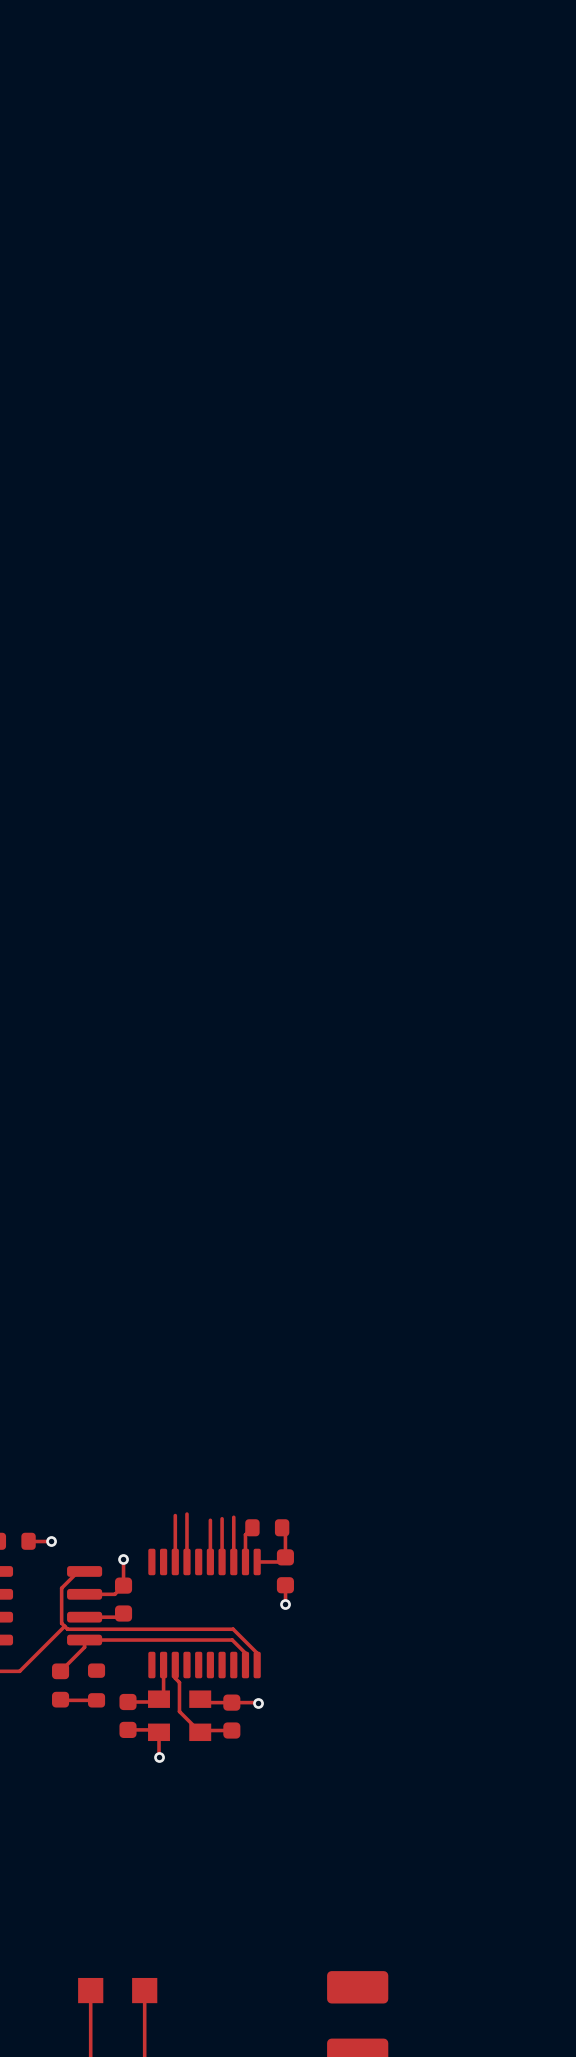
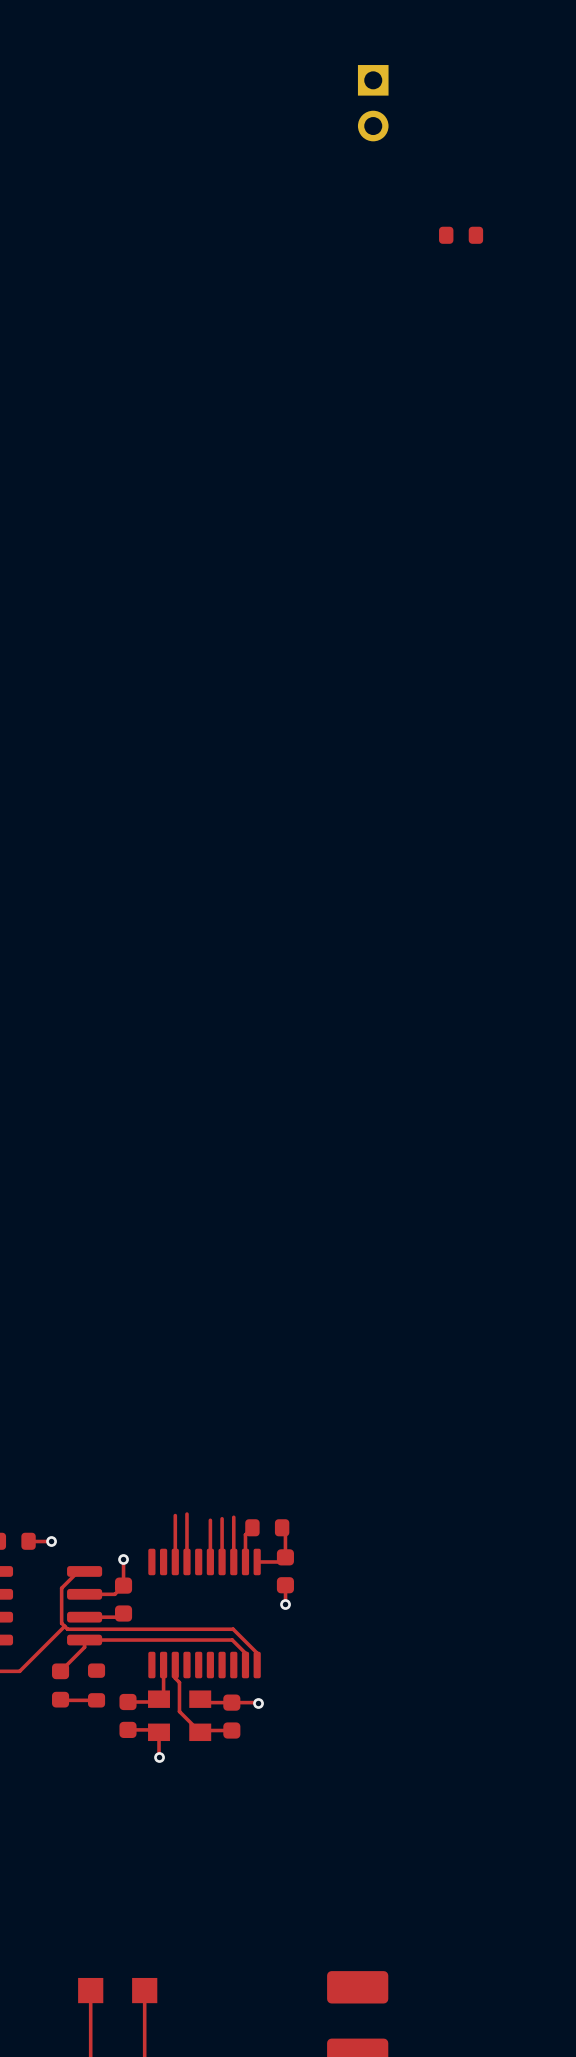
part: none -> (373, 103)
part: none -> (461, 235)

